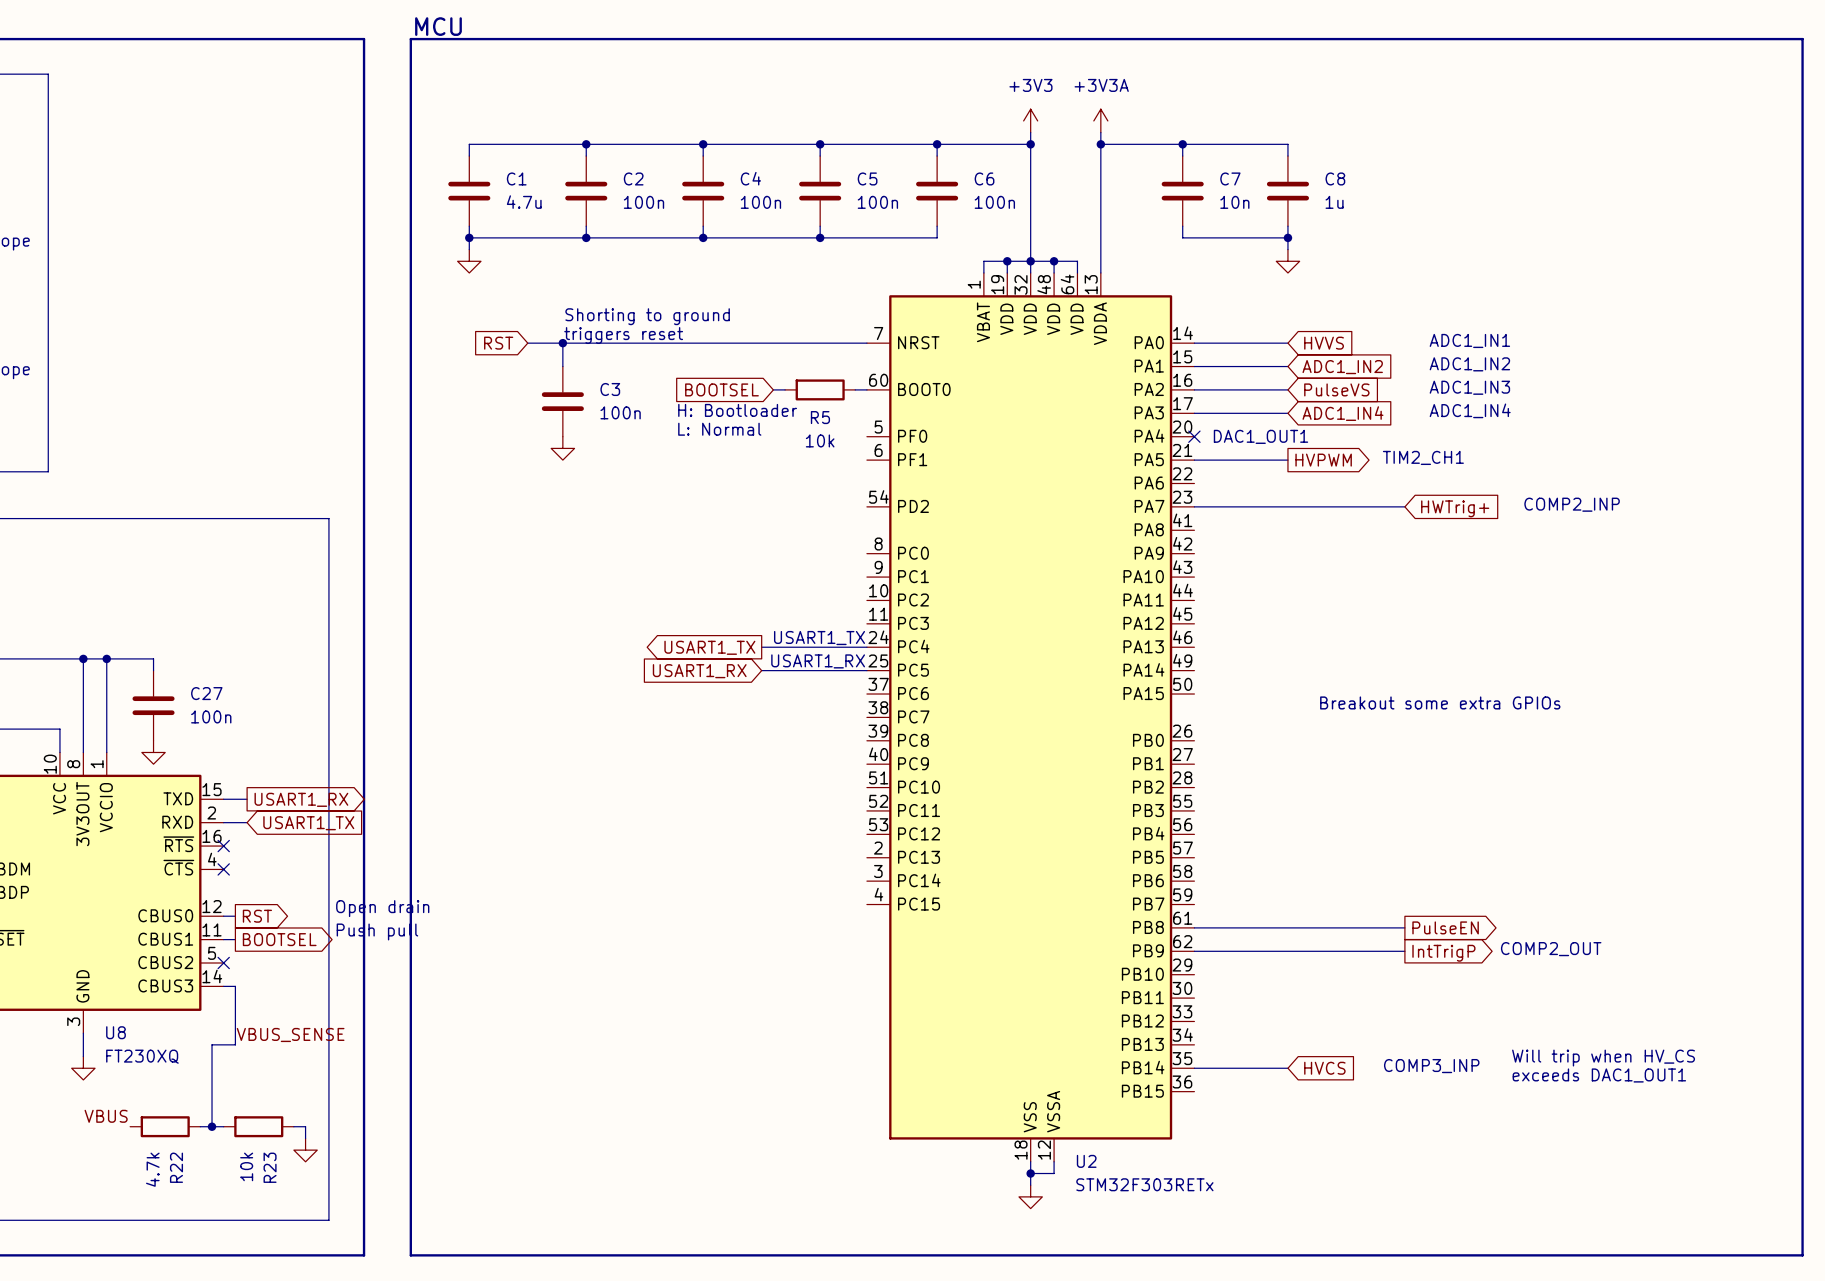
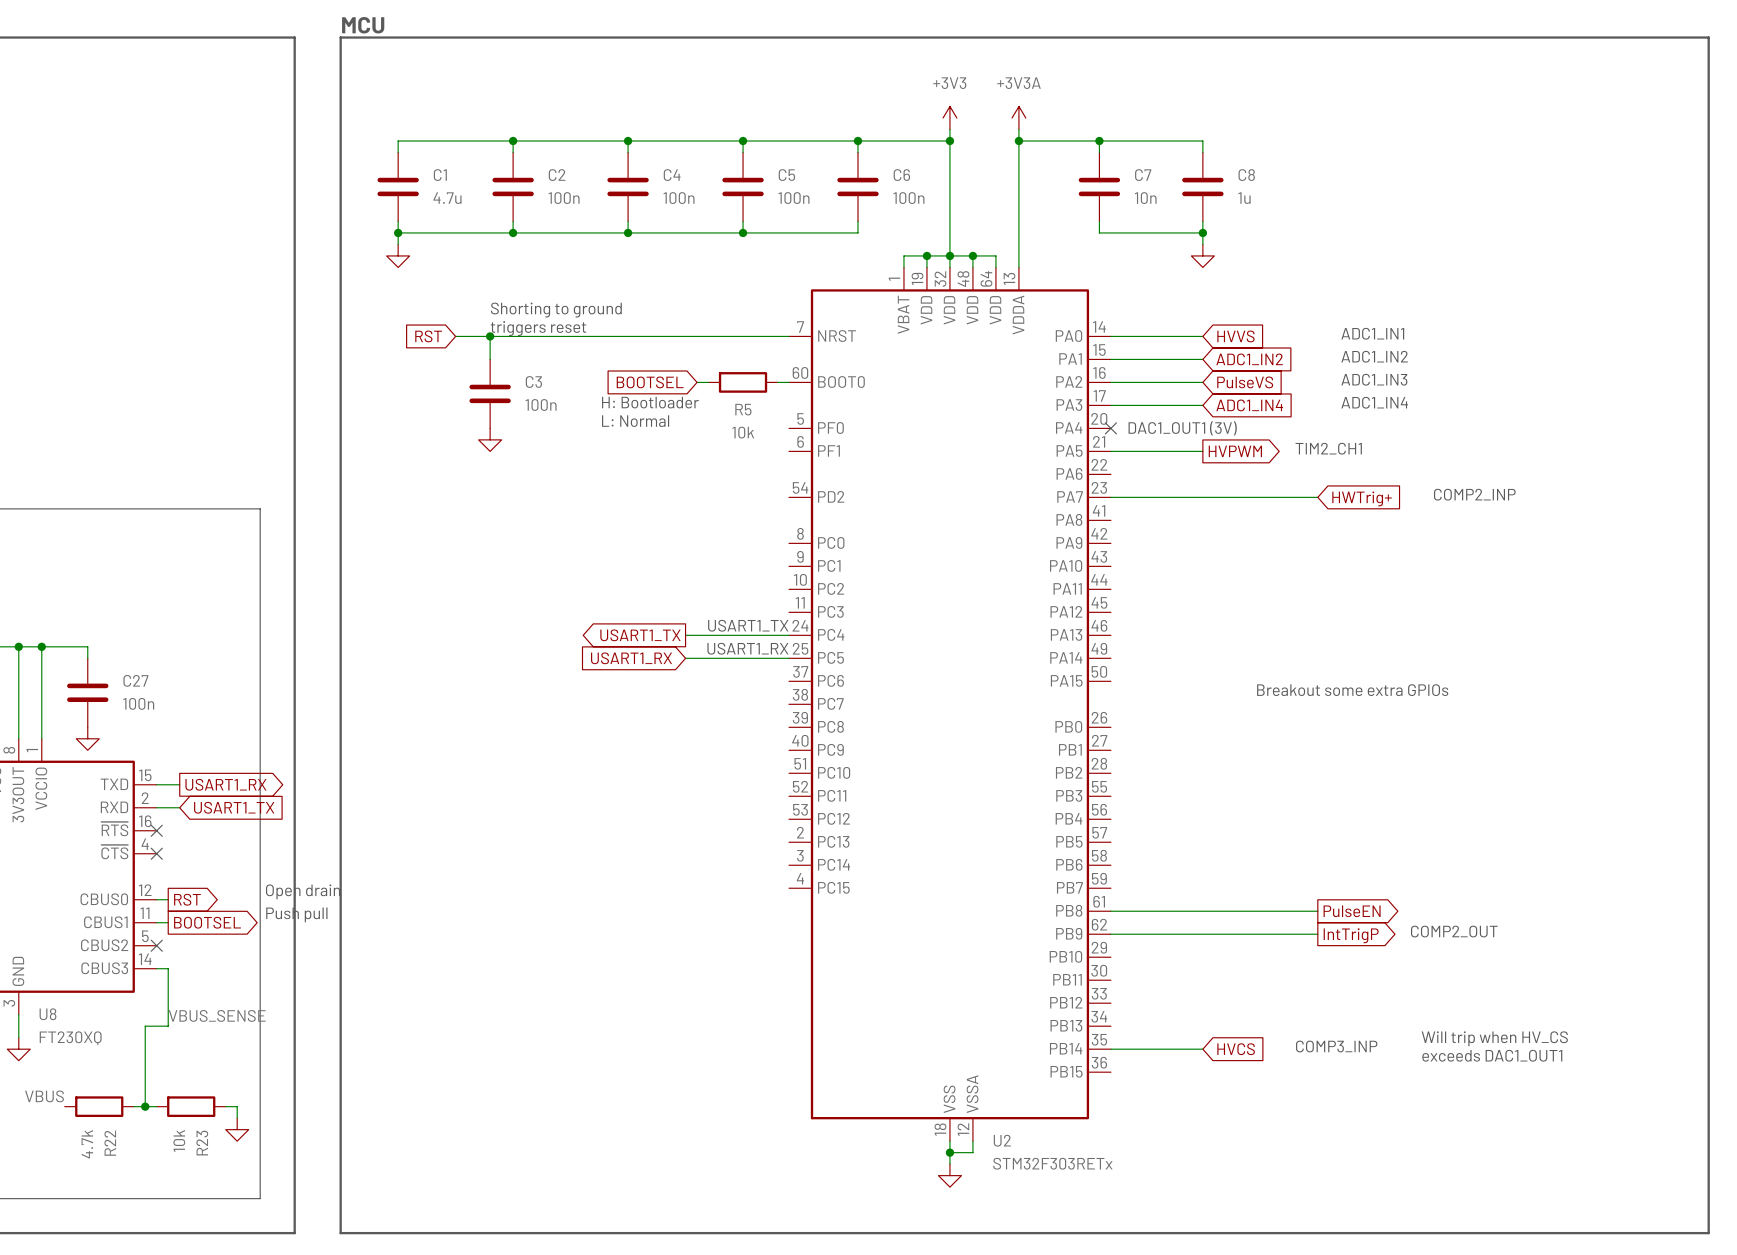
text: DAC1_OUT1 (1260, 436) -> DAC1_OUT1 (3V) (1182, 428)

